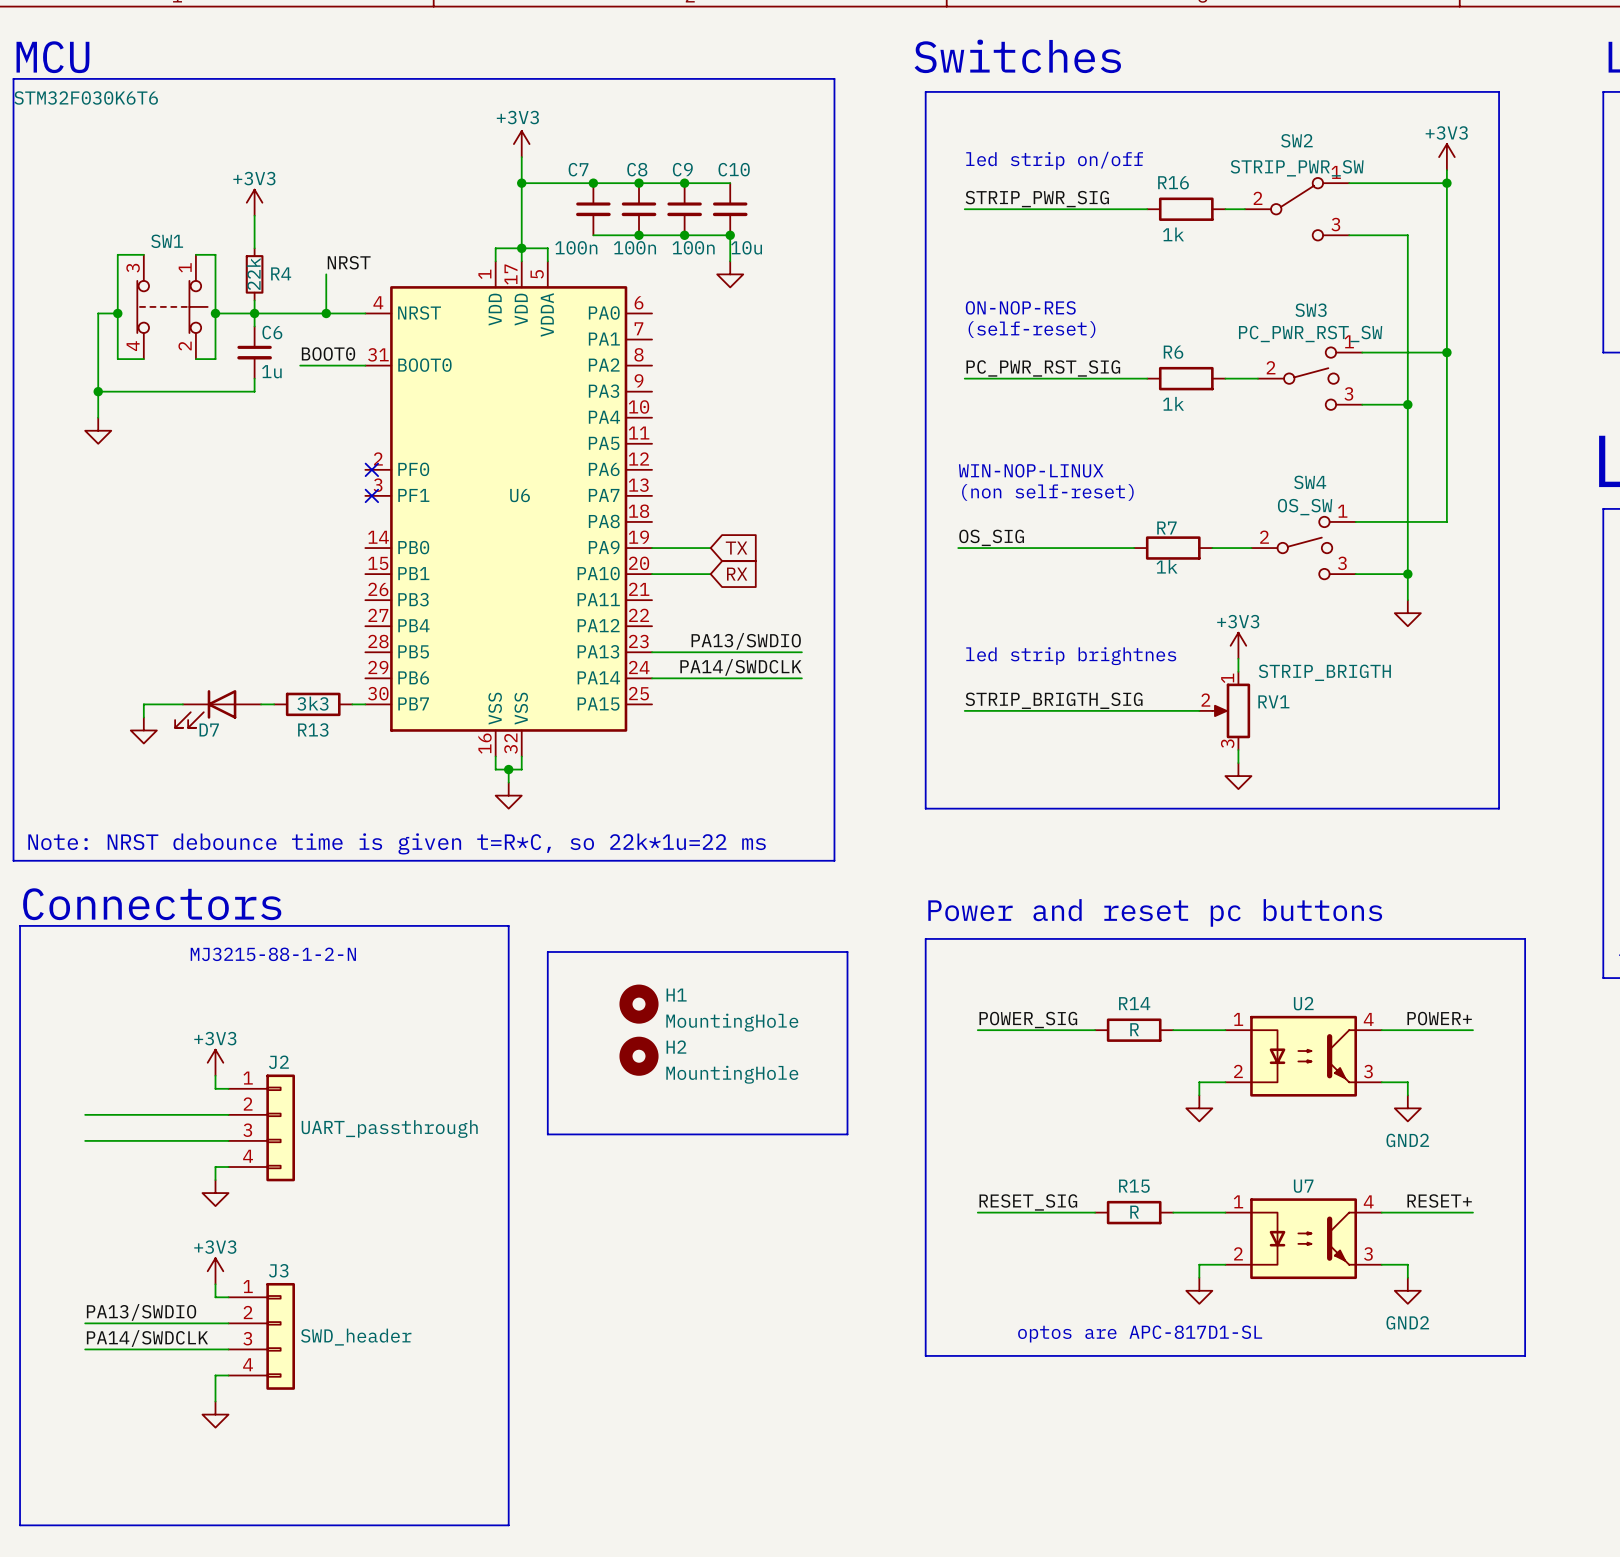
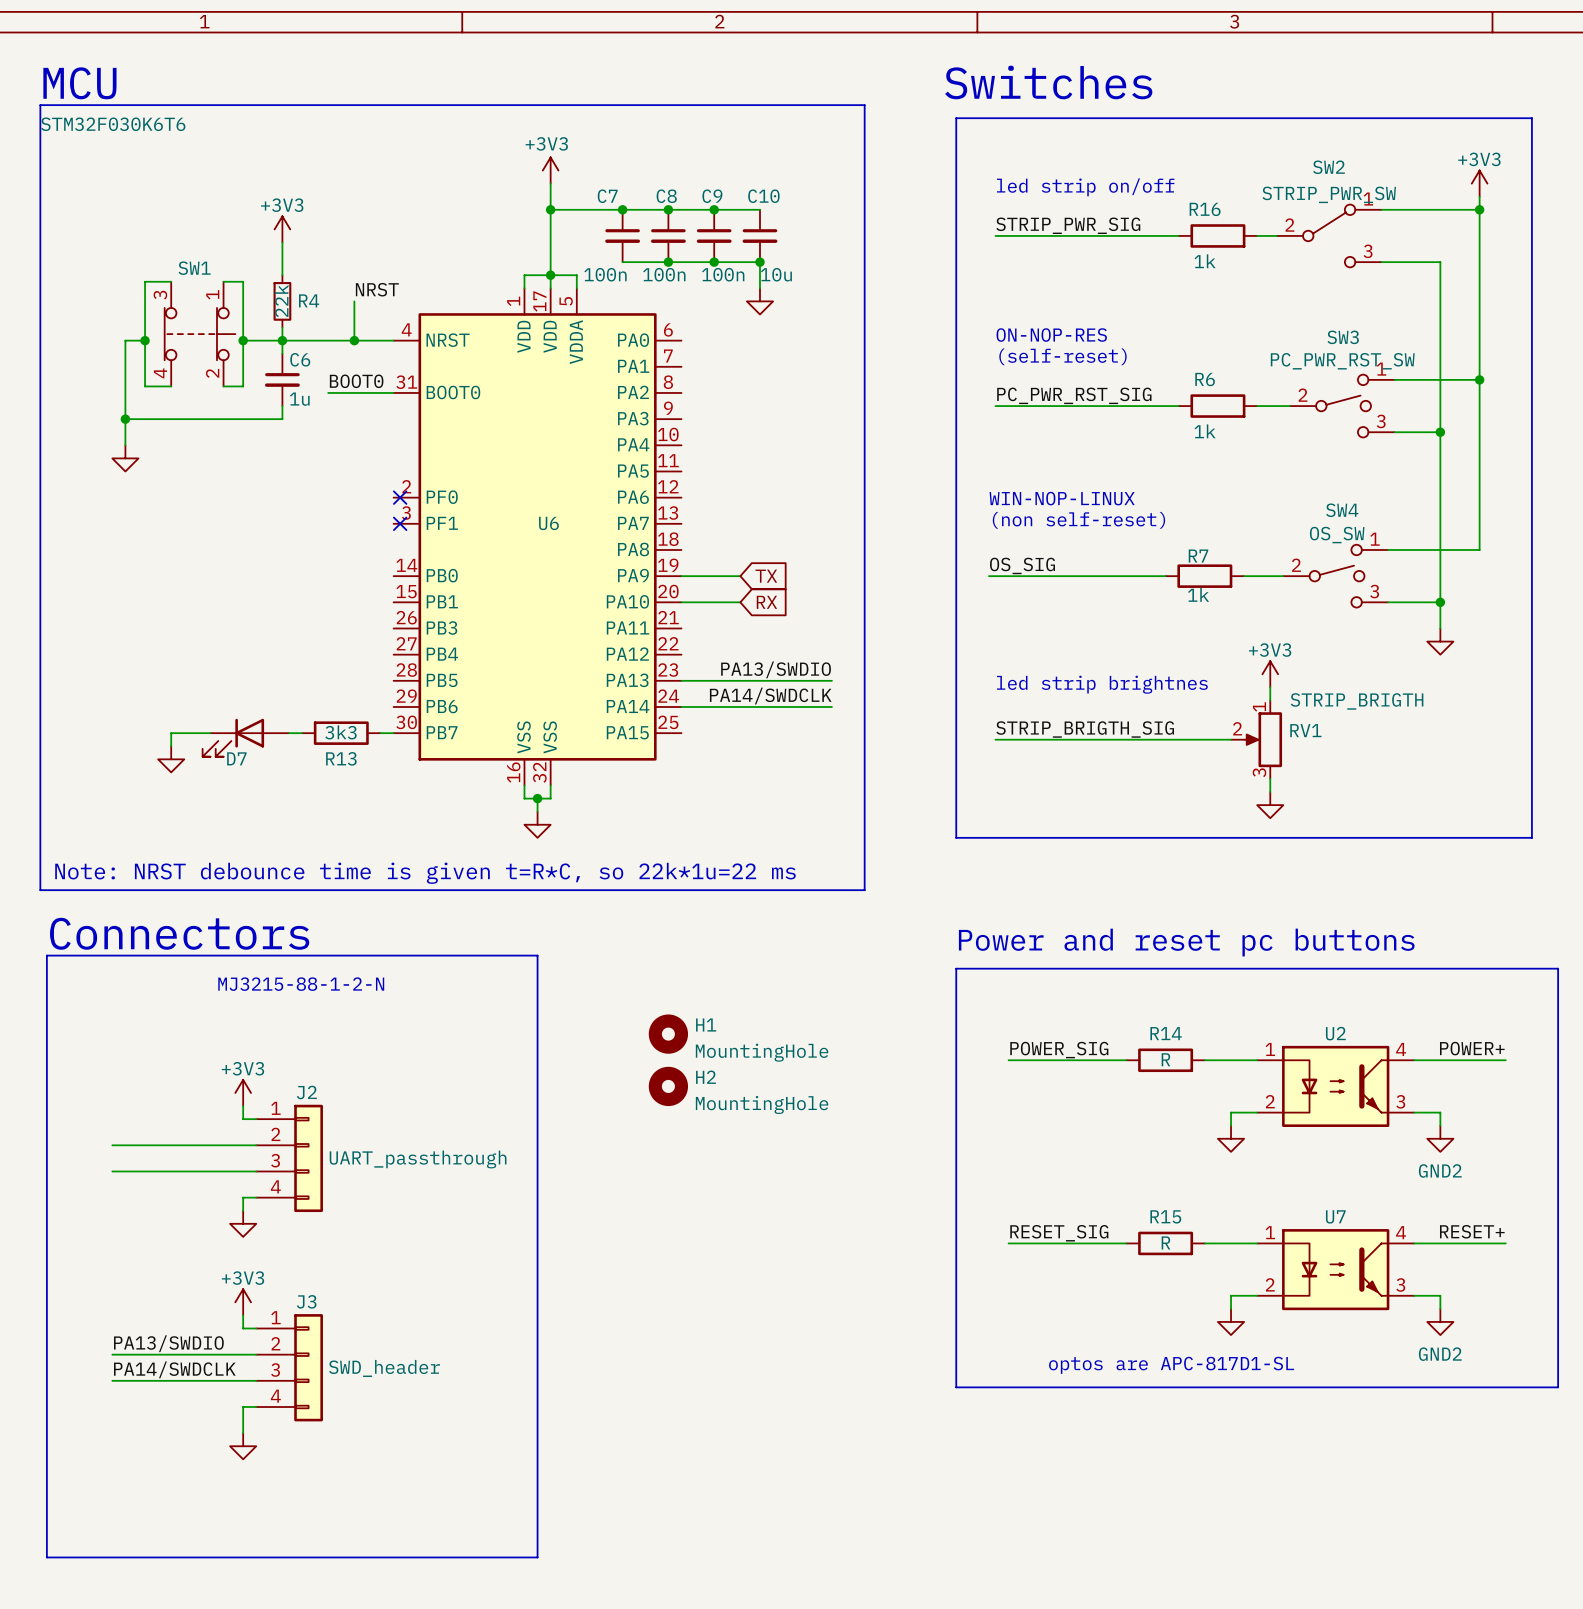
line: (547, 951) (547, 1134) (847, 1134) (847, 951) (547, 951) -> none

